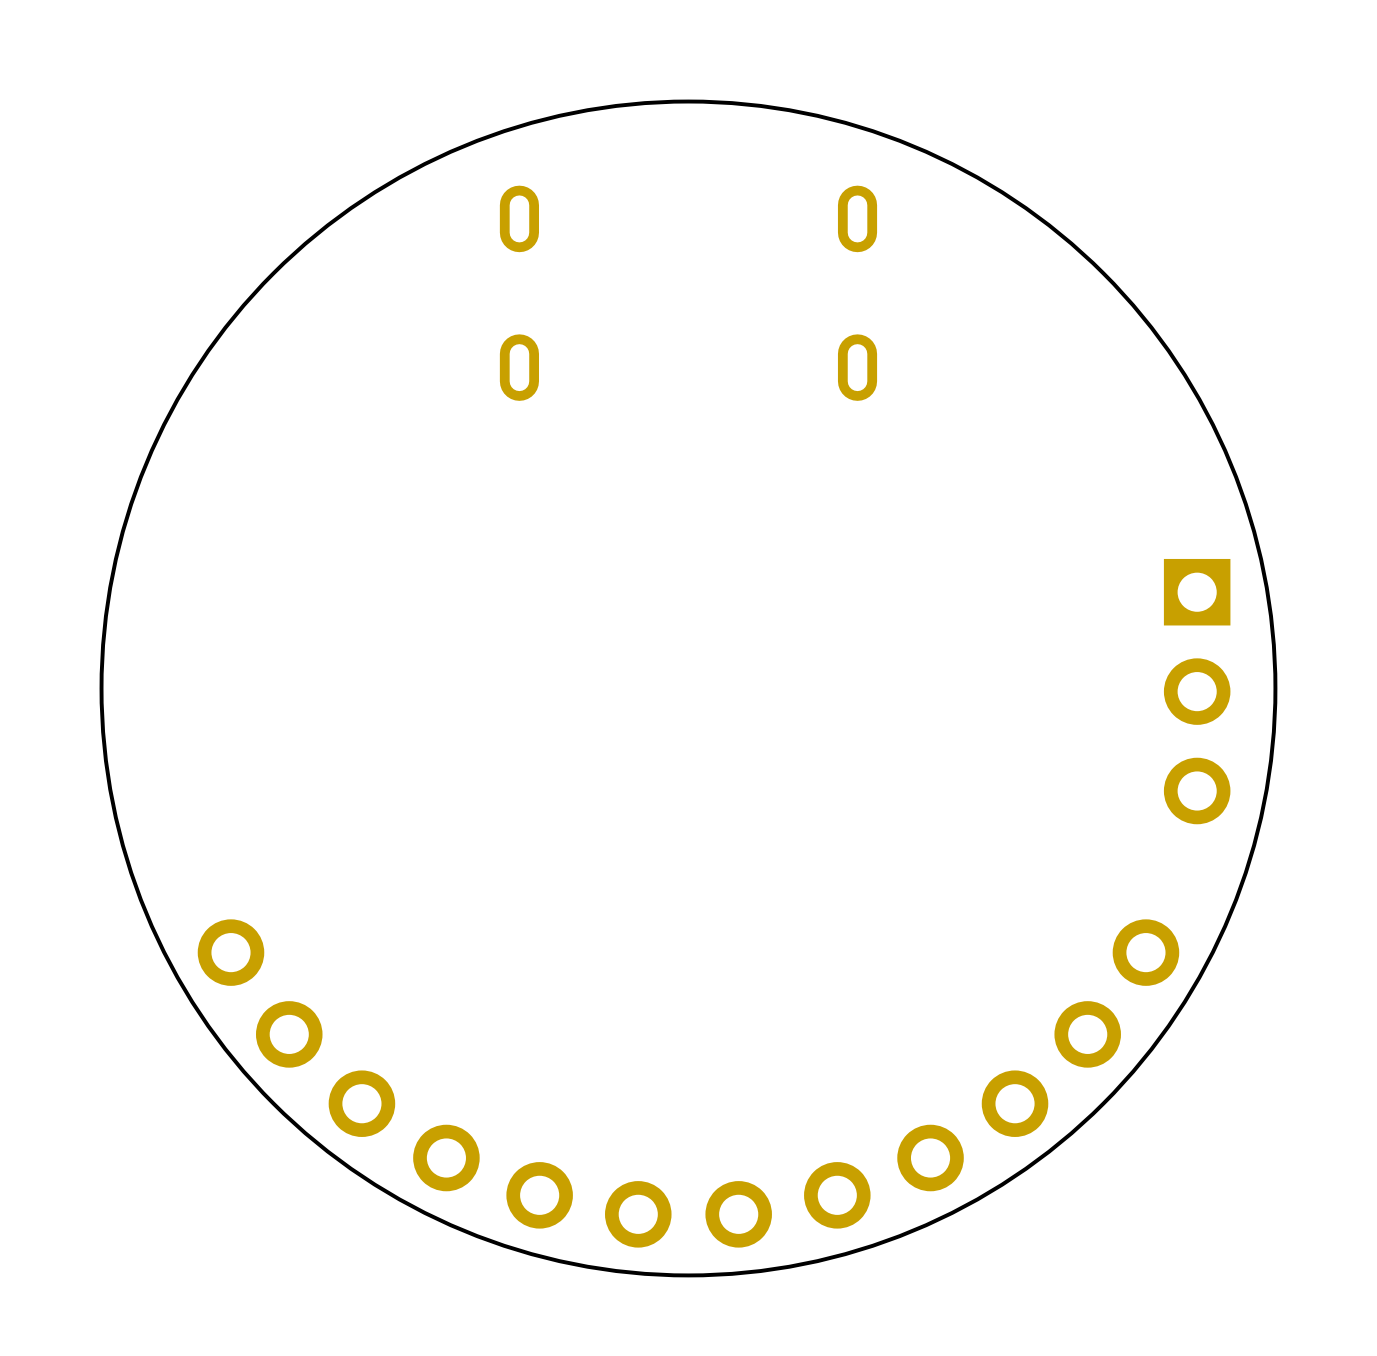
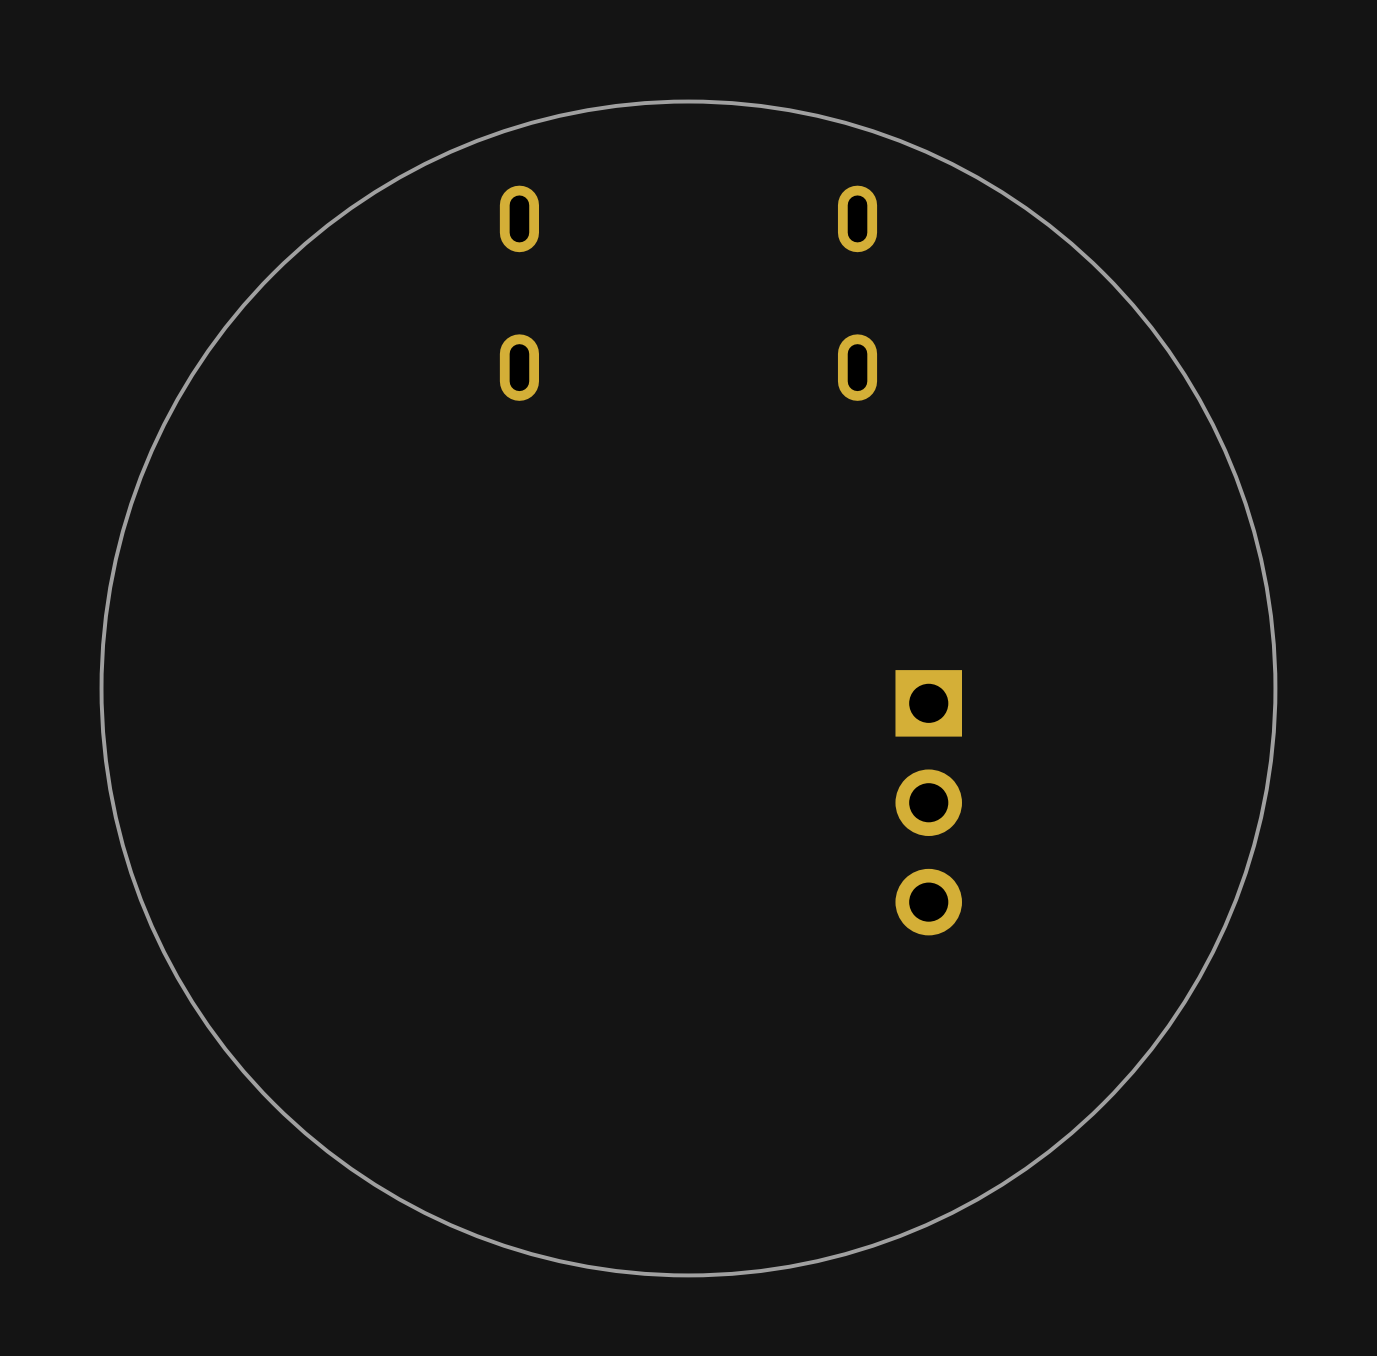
part position: (1197, 691) -> (928, 802)
part: (688, 1083) -> none

